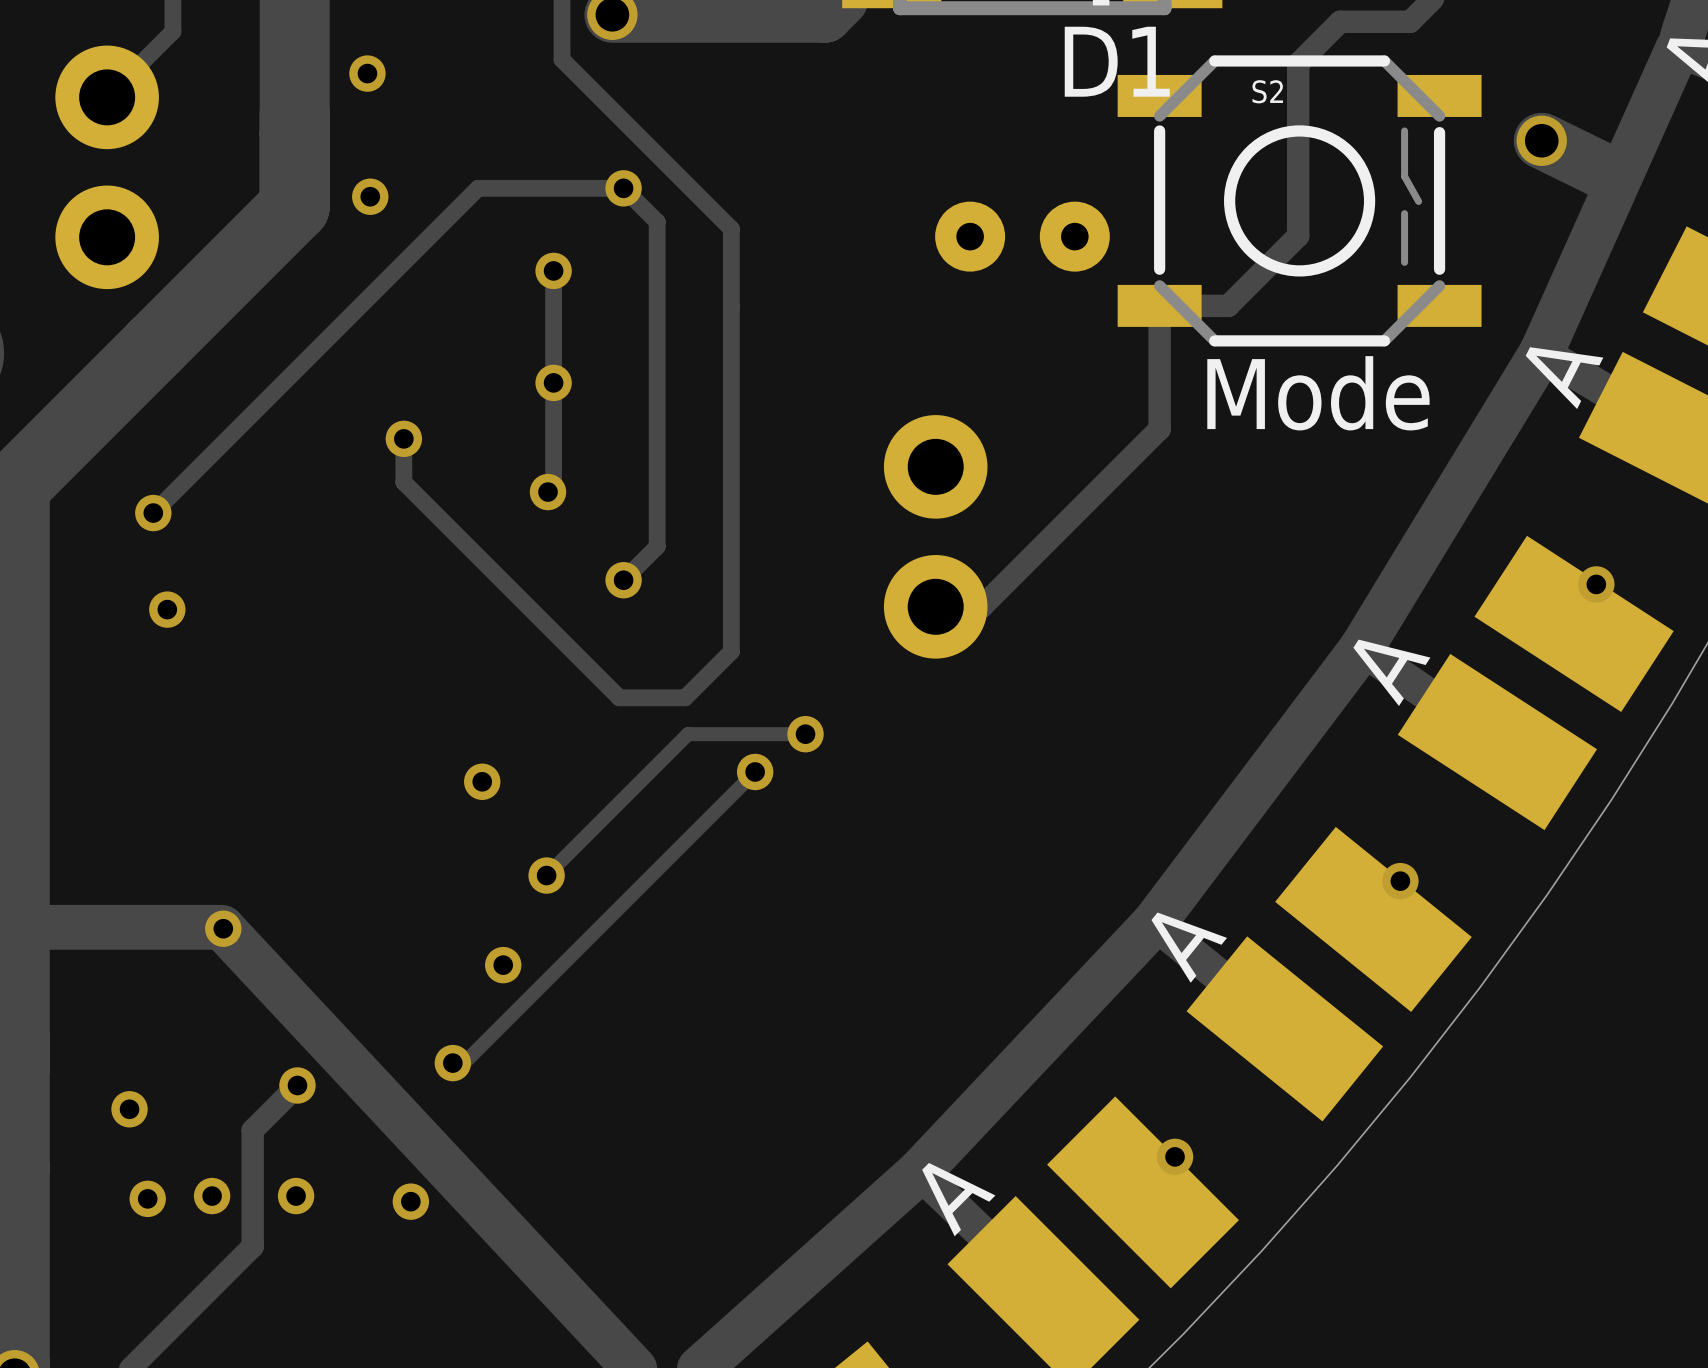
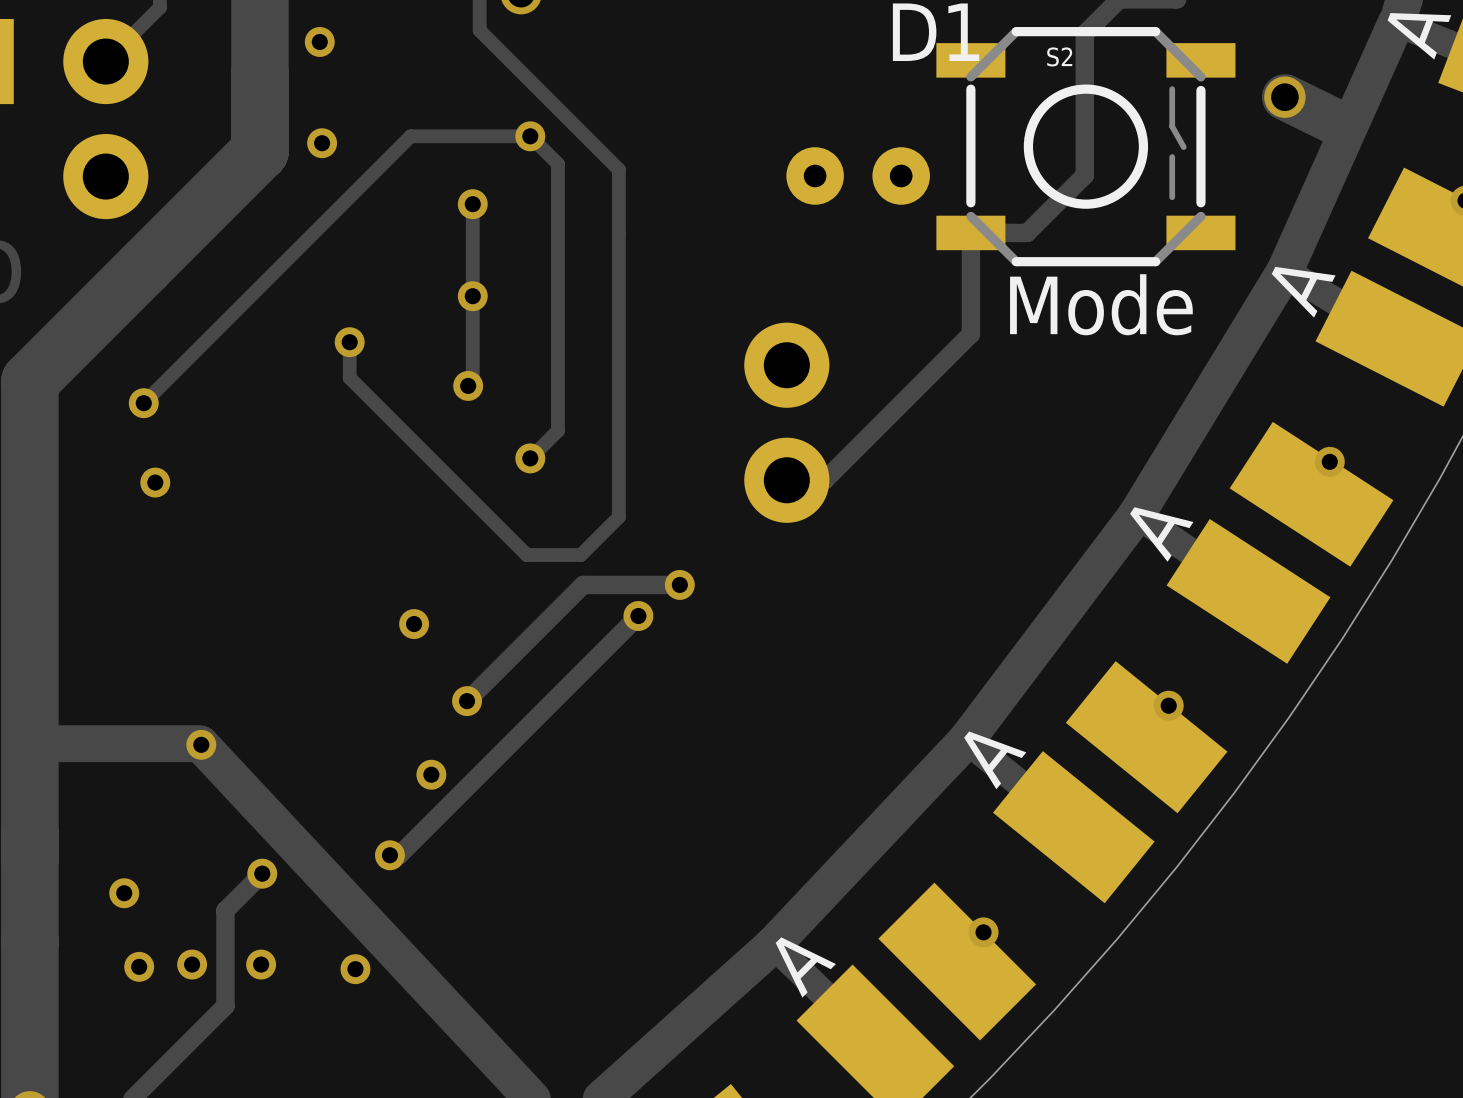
track width: thin (805, 734) (687, 734) (546, 875) -> thick (679, 584) (583, 584) (467, 701)
track width: thin (755, 771) (464, 1063) (452, 1063) -> thick (638, 616) (399, 855) (389, 855)

